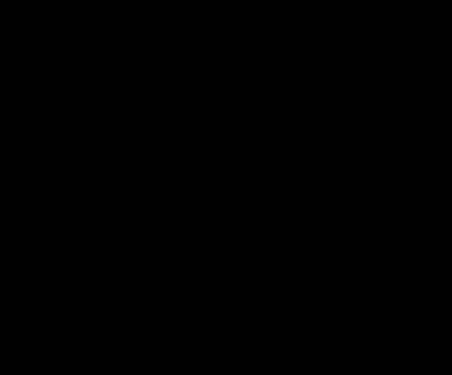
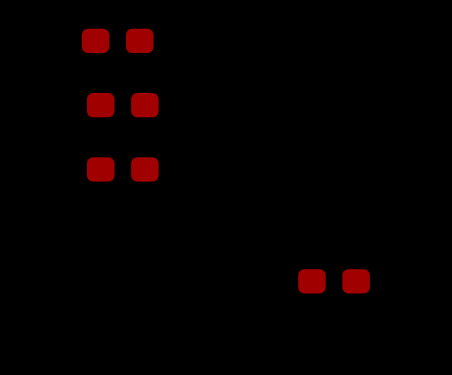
part: none -> (117, 40)
part: none -> (122, 105)
part: none -> (122, 169)
part: none -> (334, 281)

